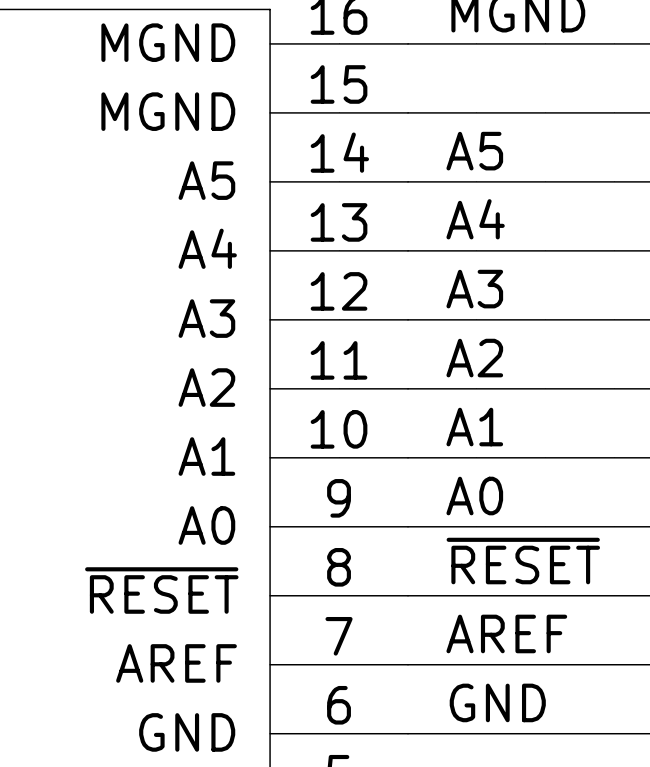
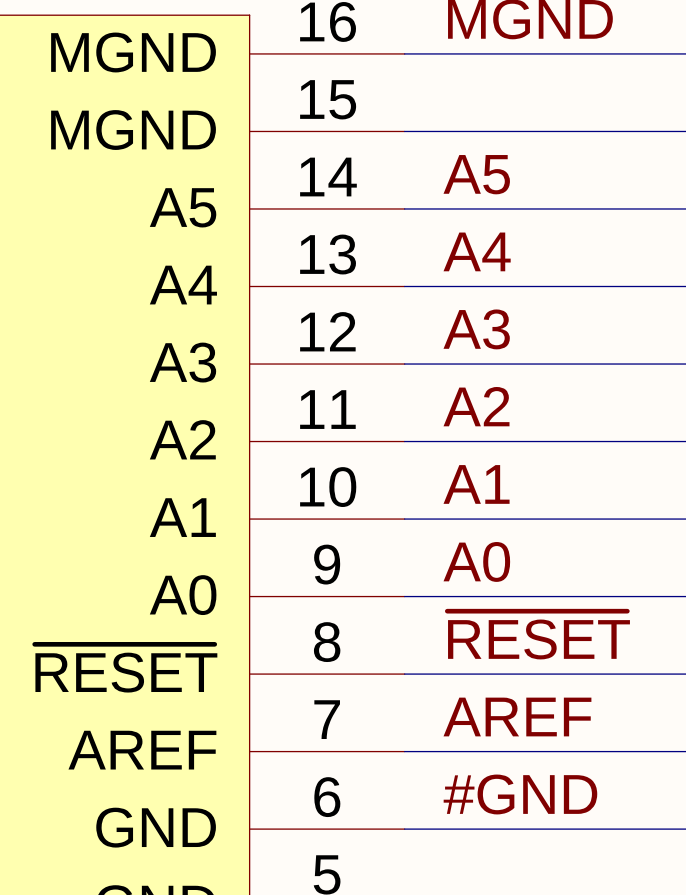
label: GND (497, 702) -> #GND (520, 794)

